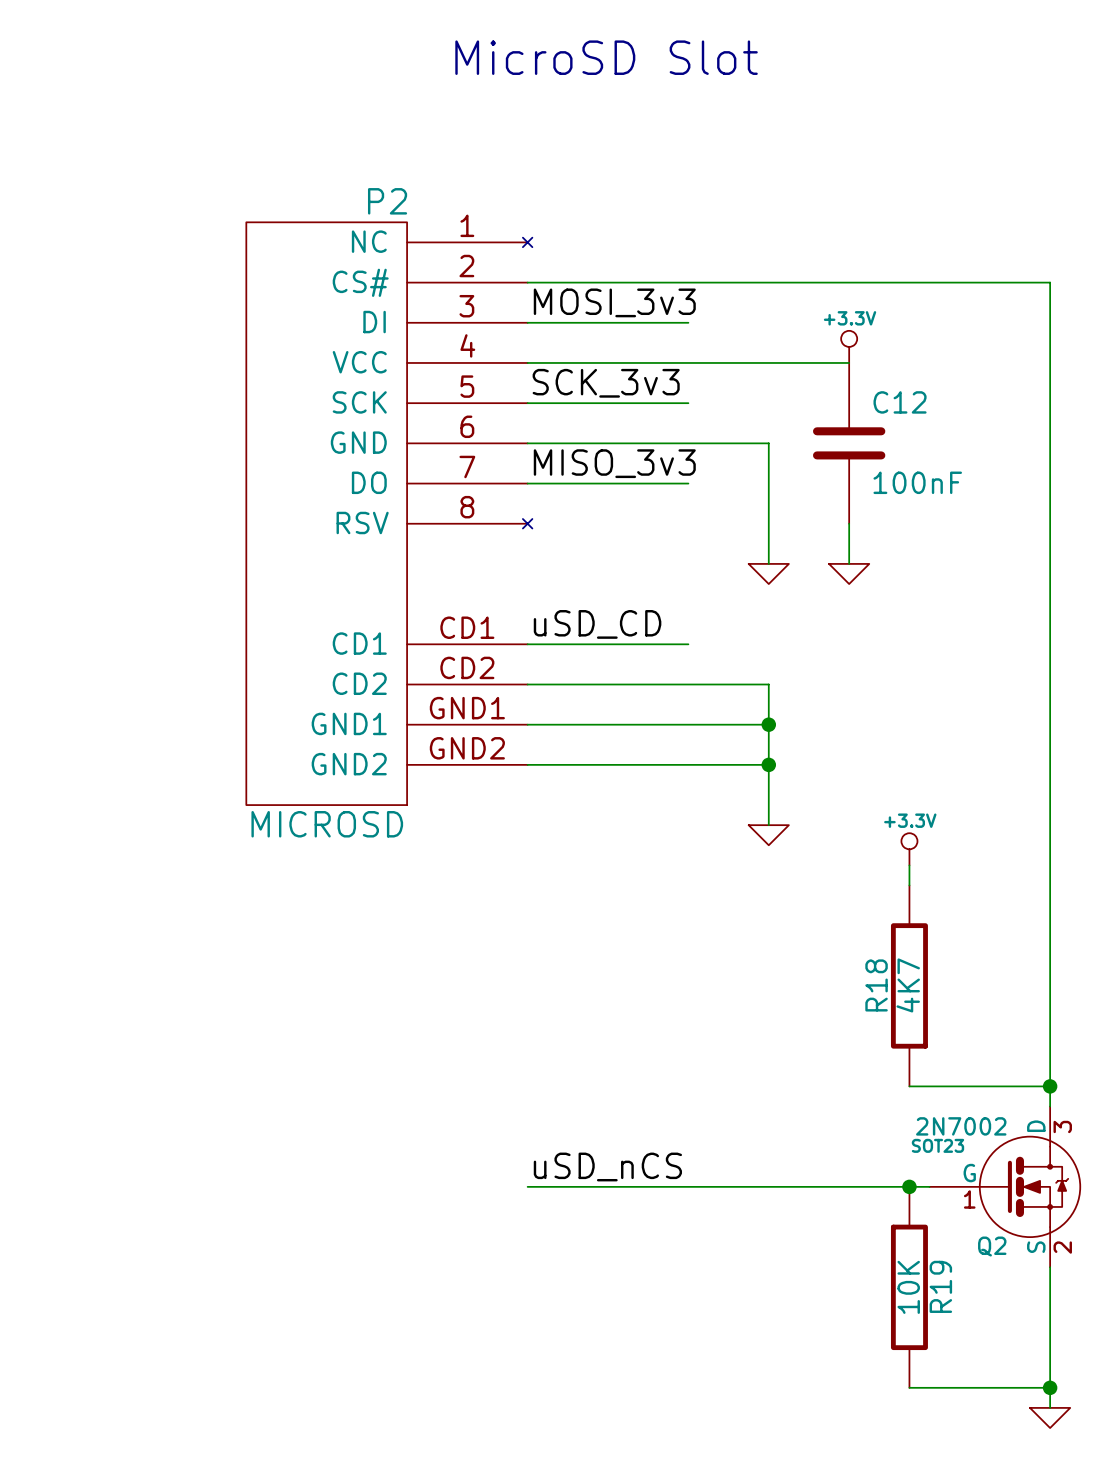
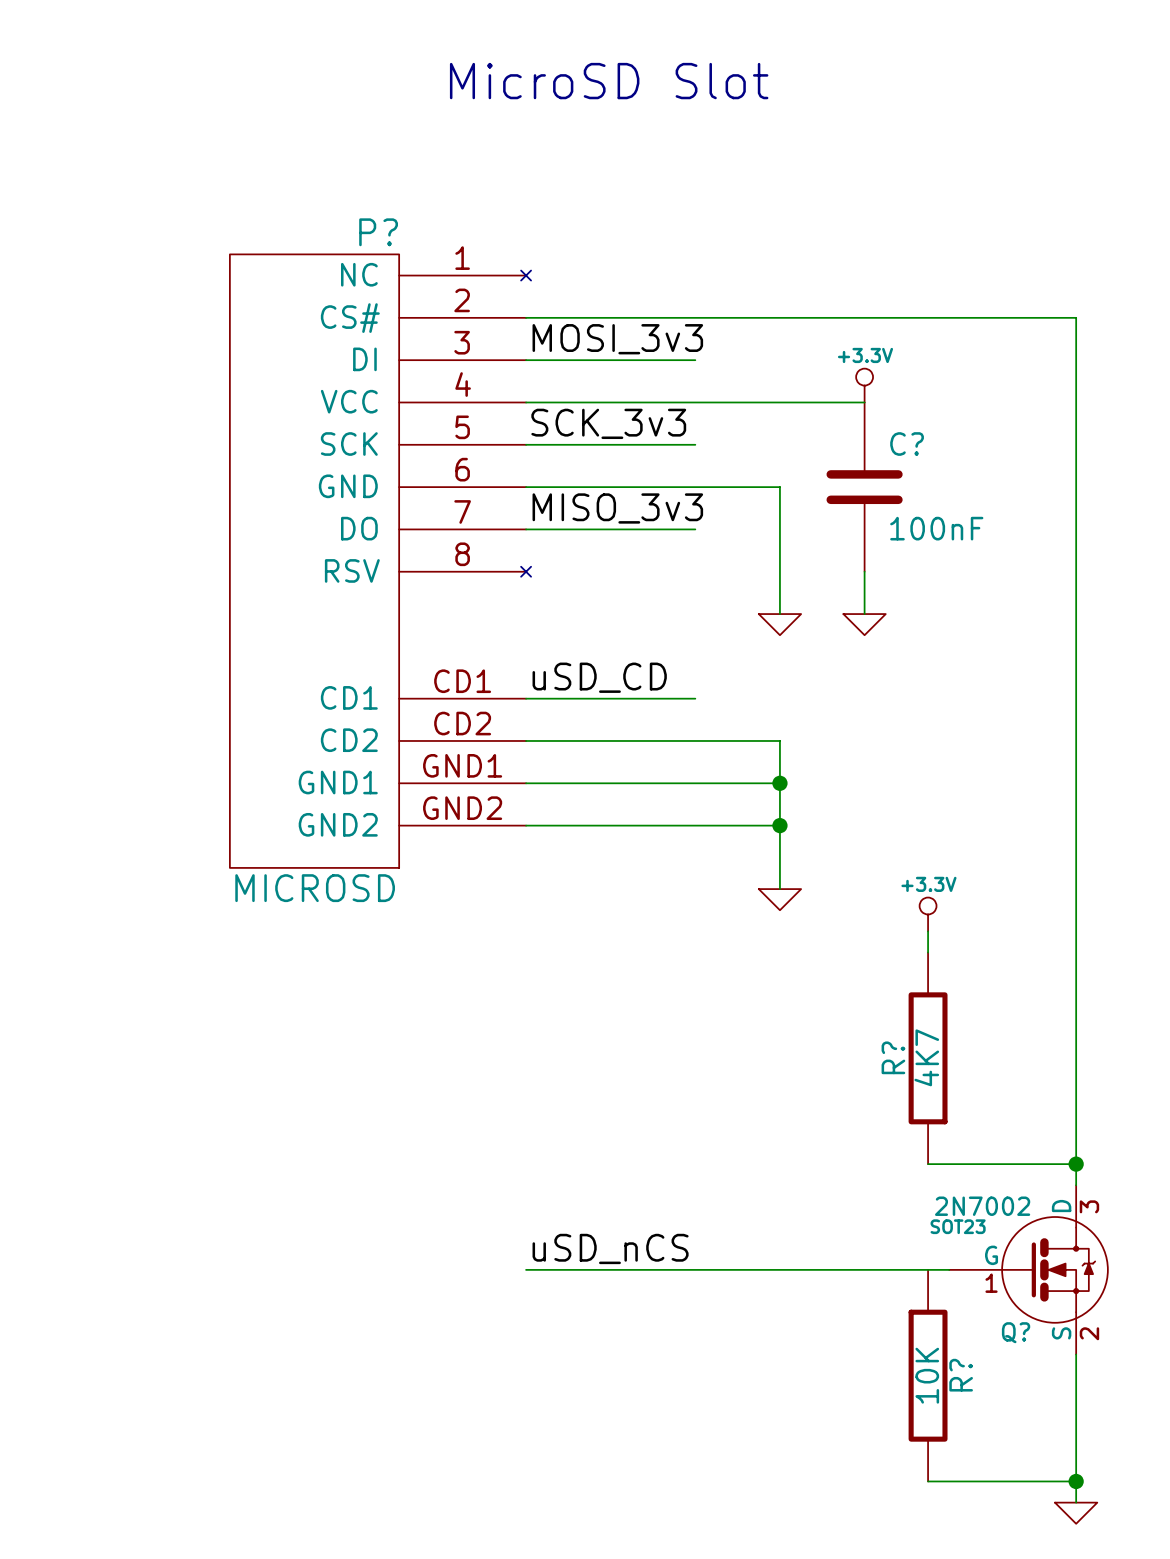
P2 name: P2 (387, 201) -> P? (378, 232)
C12 name: C12 (900, 402) -> C? (907, 444)
R18 name: R18 (876, 985) -> R? (893, 1057)
junction: (909, 1186) -> none
Q2 name: Q2 (992, 1246) -> Q? (1016, 1332)
R19 name: R19 (940, 1286) -> R? (961, 1375)

